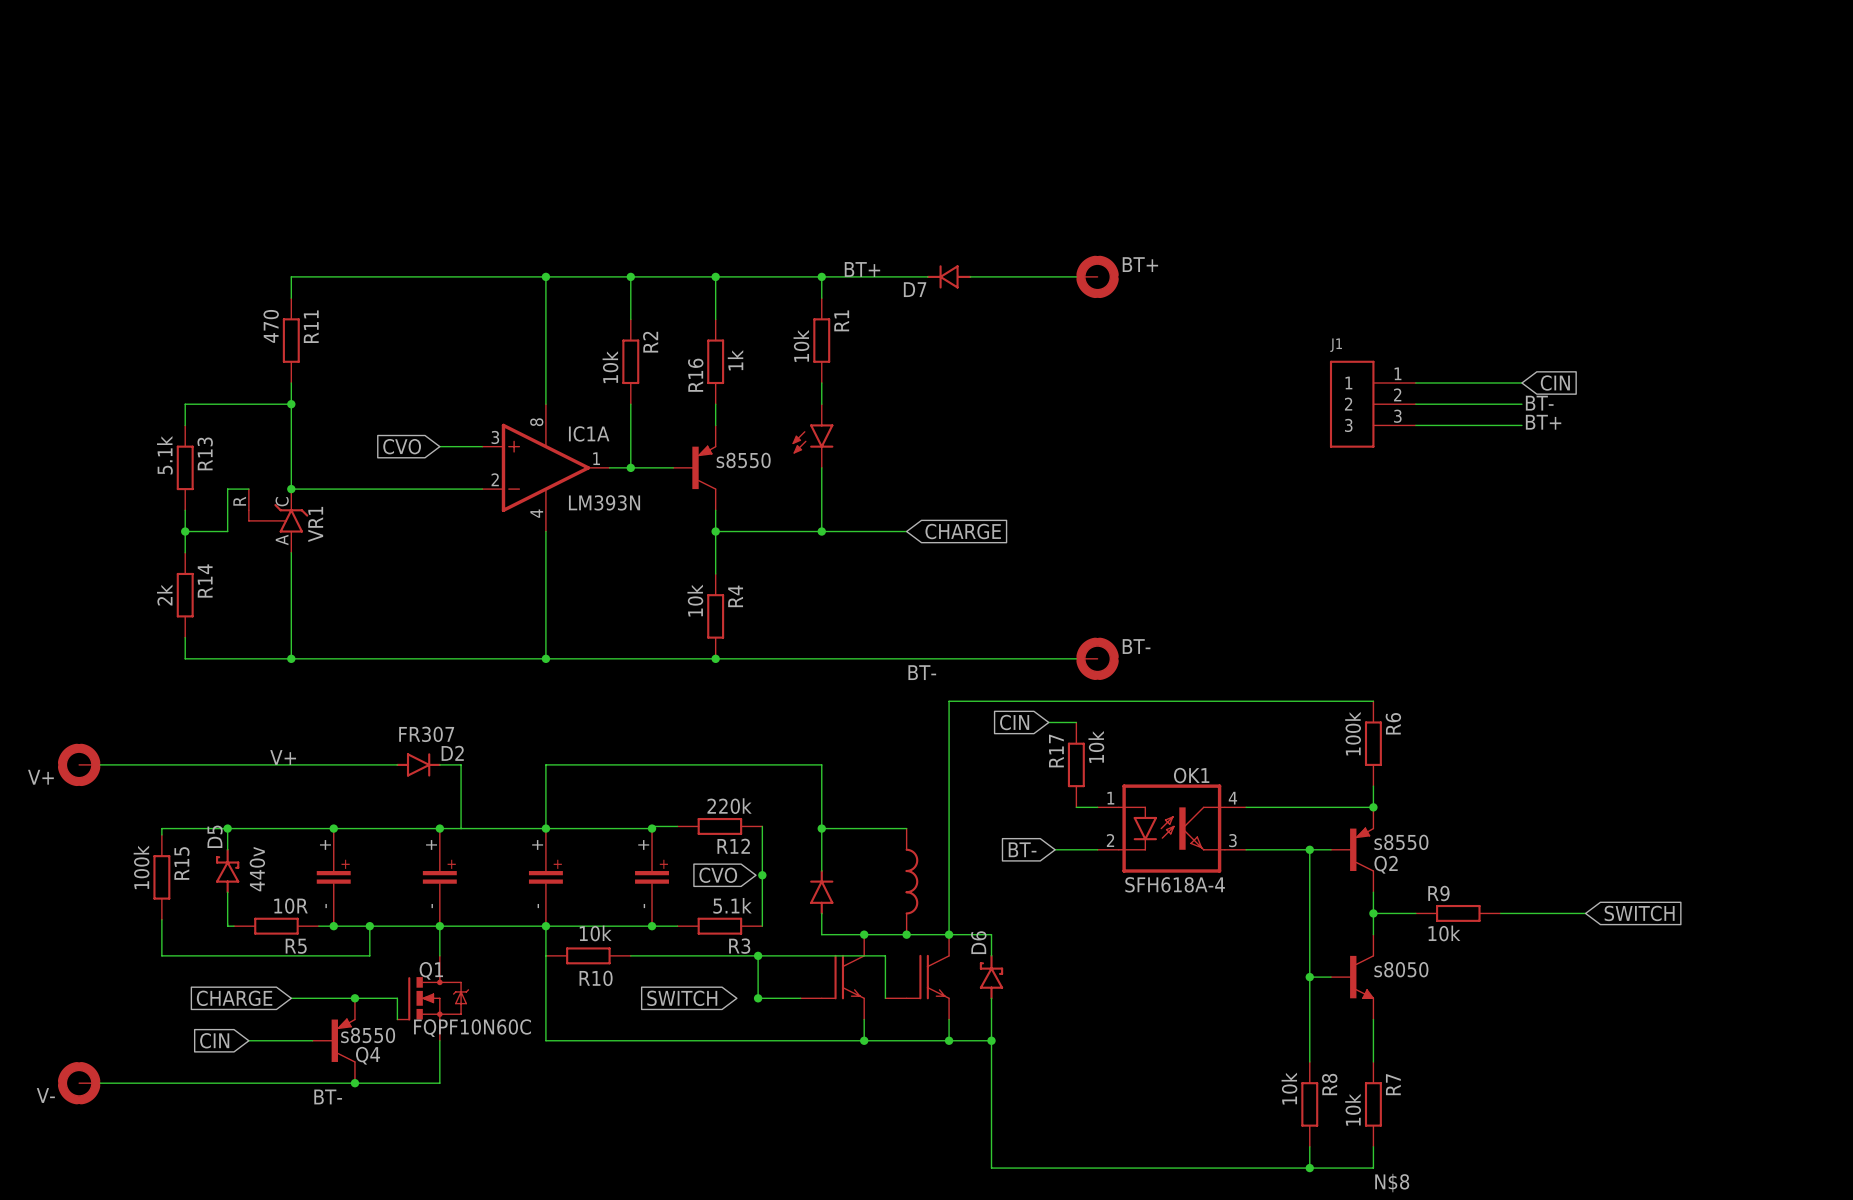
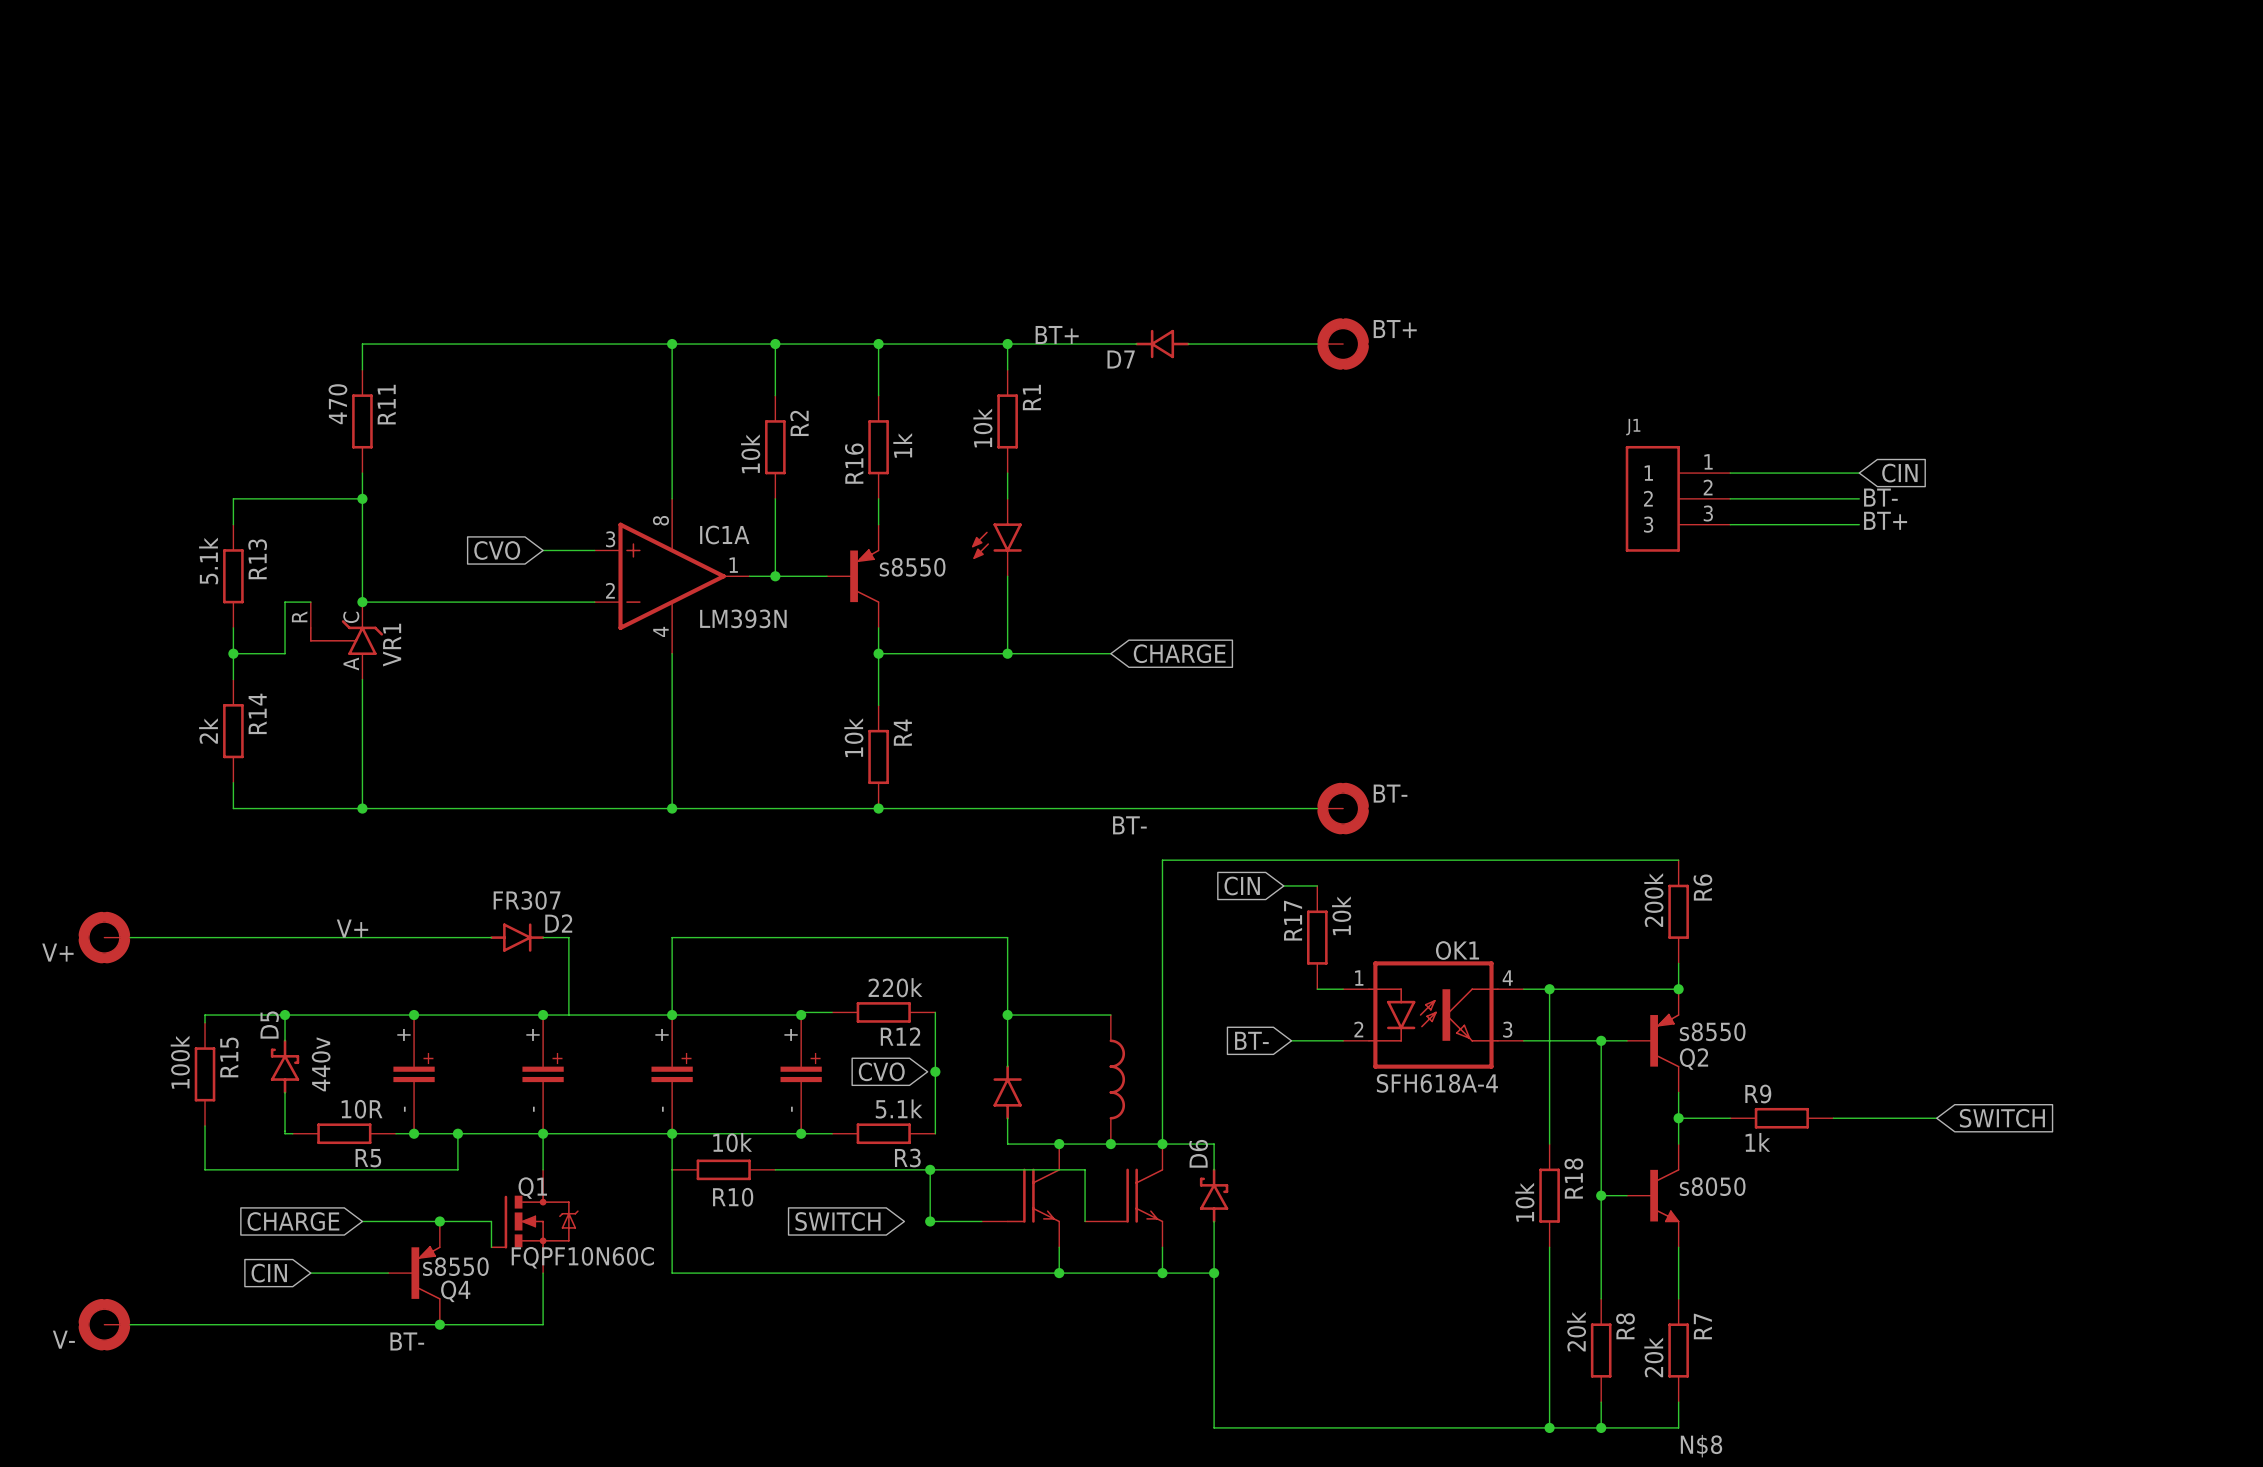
R6 value: 100k (1353, 733) -> 200k (1653, 900)
wire: none -> (1549, 989) (1549, 1144)
junction: none -> (1549, 989)
R9 value: 10k (1444, 933) -> 1k (1757, 1142)
R18: none -> 10k (1549, 1195)
wire: none -> (1549, 1247) (1549, 1427)
R8 value: 10k (1289, 1088) -> 20k (1576, 1331)
R7 value: 10k (1353, 1109) -> 20k (1653, 1357)
junction: none -> (1549, 1427)

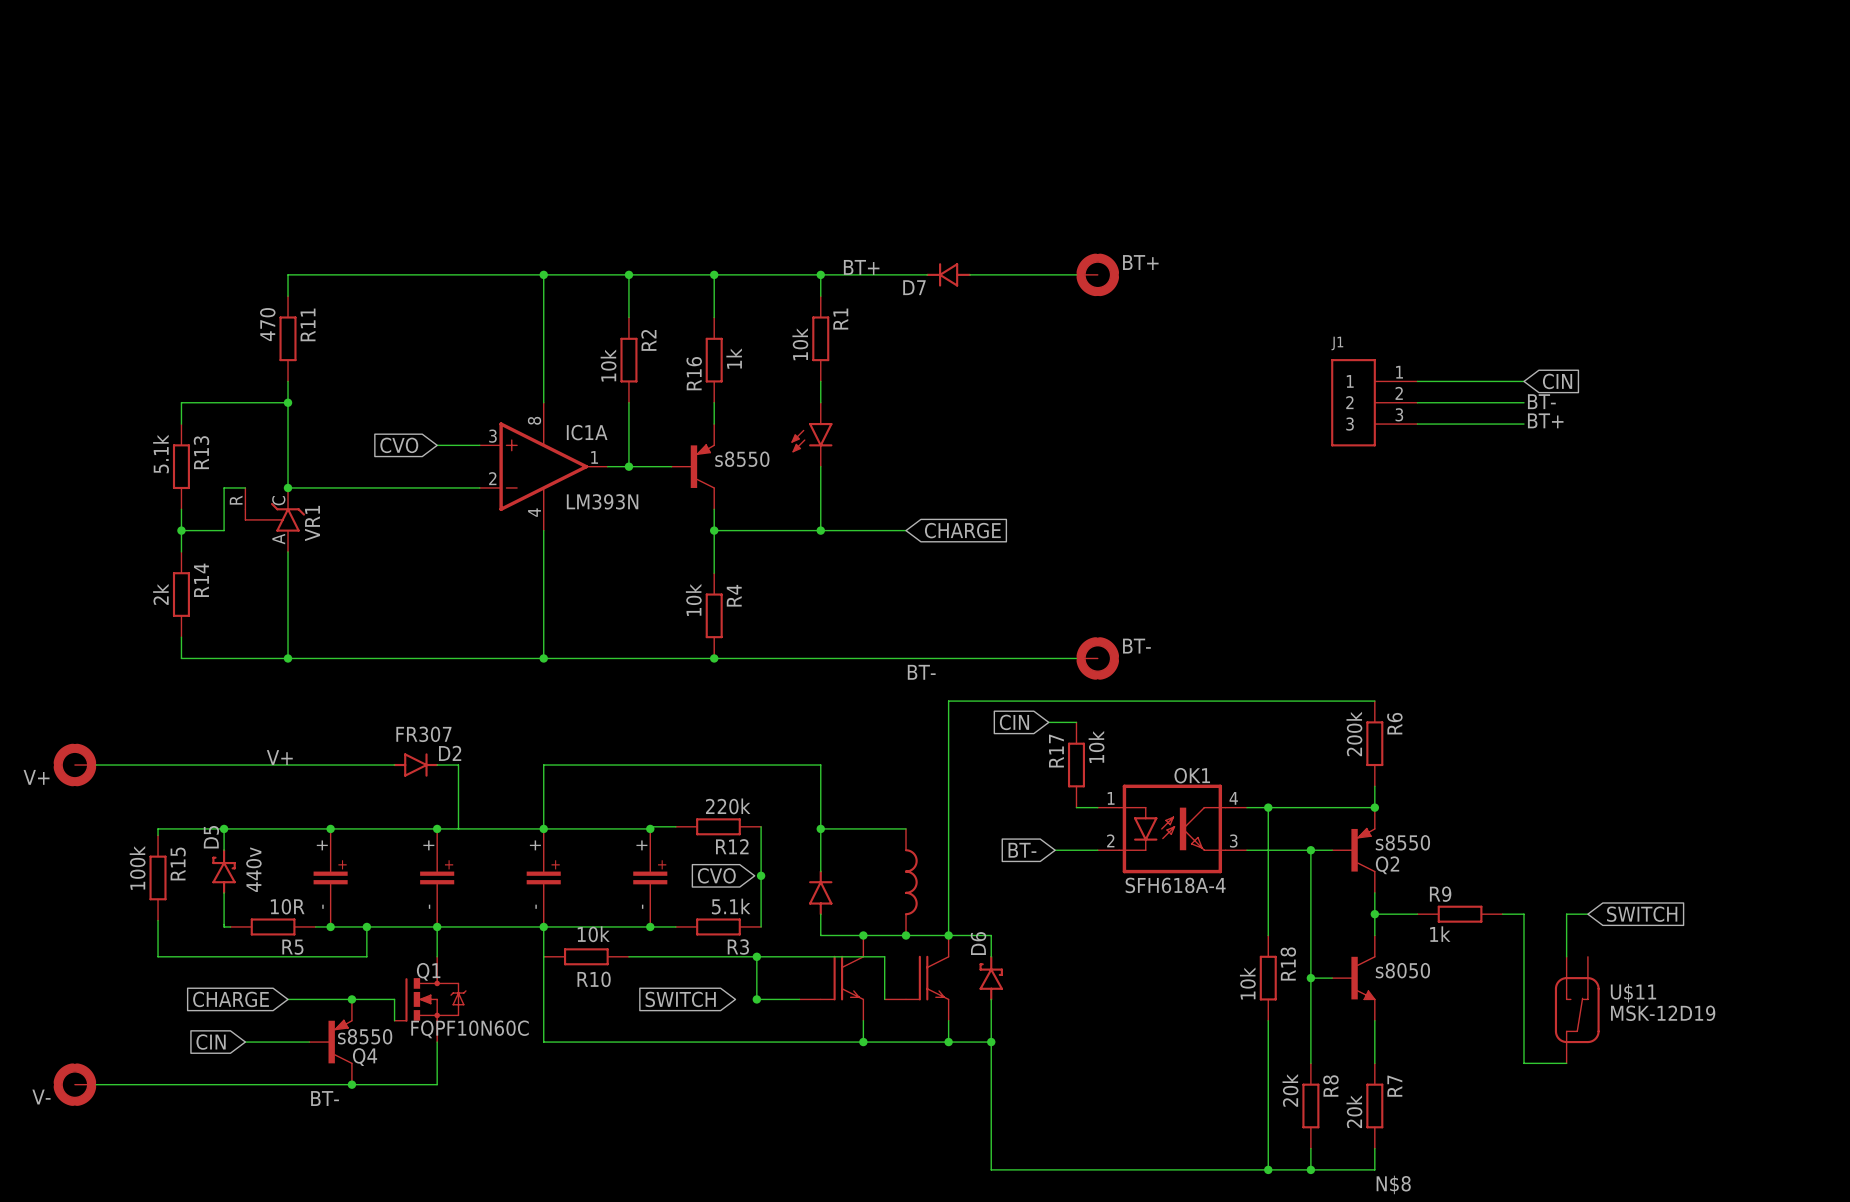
wire: (1859, 1118) (1910, 1118) -> (1566, 956) (1566, 914)
wire: none -> (1523, 914) (1523, 1063) (1566, 1063)
U$11: none -> MSK-12D19 (1577, 1010)

